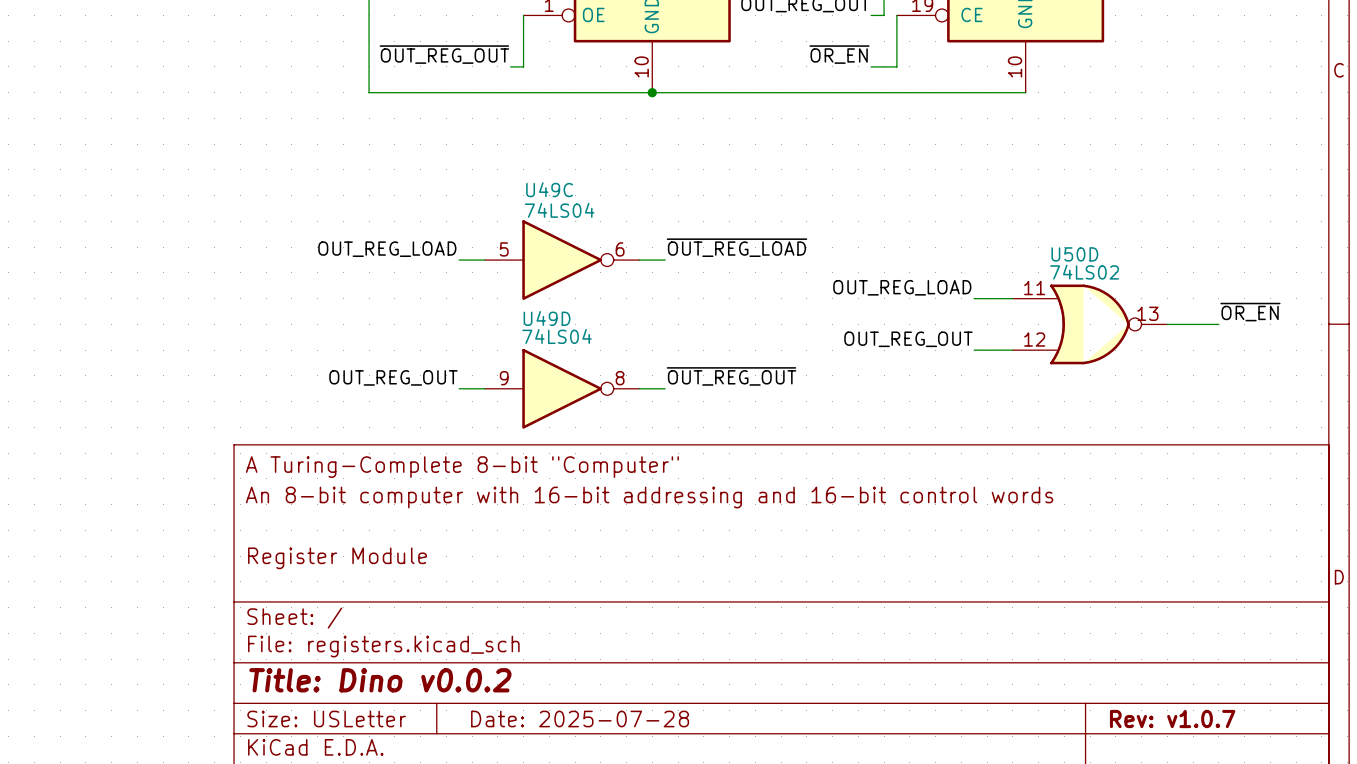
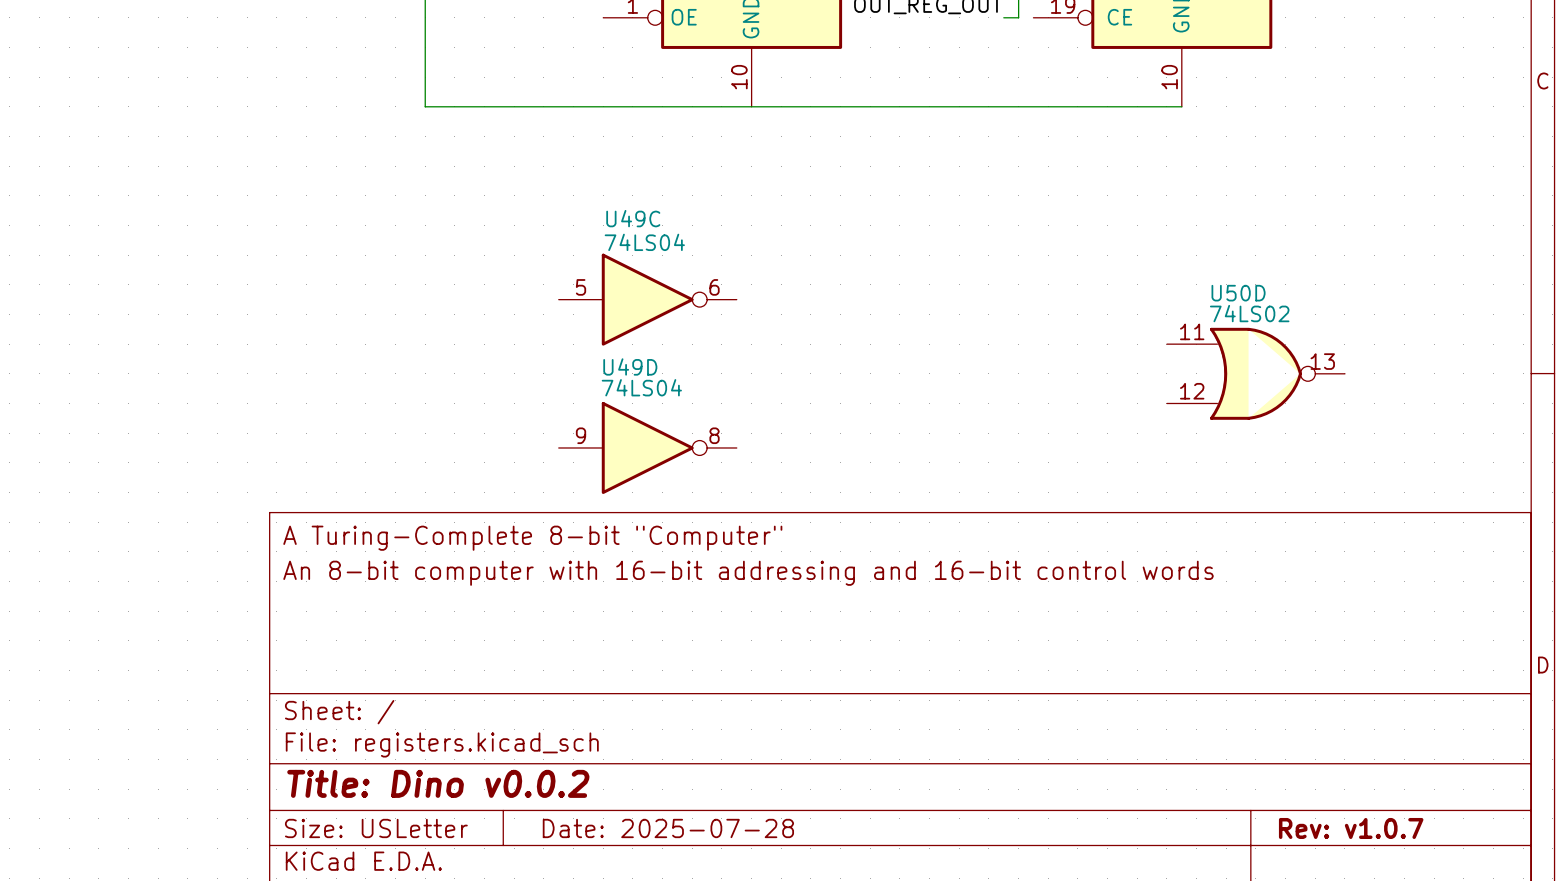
wire: (523, 15) (523, 66) (510, 66) -> none
wire: (896, 15) (896, 66) (871, 66) -> none
label: ~{OUT_REG_OUT} (444, 54) -> none
label: ~{OR_EN} (839, 54) -> none
junction: (652, 92) -> none
label: ~{OUT_REG_LOAD} (736, 247) -> none
label: OUT_REG_LOAD (387, 249) -> none
wire: (459, 260) (484, 260) -> none
wire: (639, 260) (665, 260) -> none
label: OUT_REG_LOAD (902, 287) -> none
wire: (974, 298) (1012, 298) -> none
label: ~{OR_EN} (1250, 312) -> none
wire: (1167, 324) (1218, 324) -> none
label: OUT_REG_OUT (908, 339) -> none
wire: (974, 350) (1012, 350) -> none
label: ~{OUT_REG_OUT} (731, 376) -> none
label: OUT_REG_OUT (393, 377) -> none
wire: (459, 388) (484, 388) -> none
wire: (639, 388) (665, 388) -> none
title block: Register Module (337, 558) -> none

